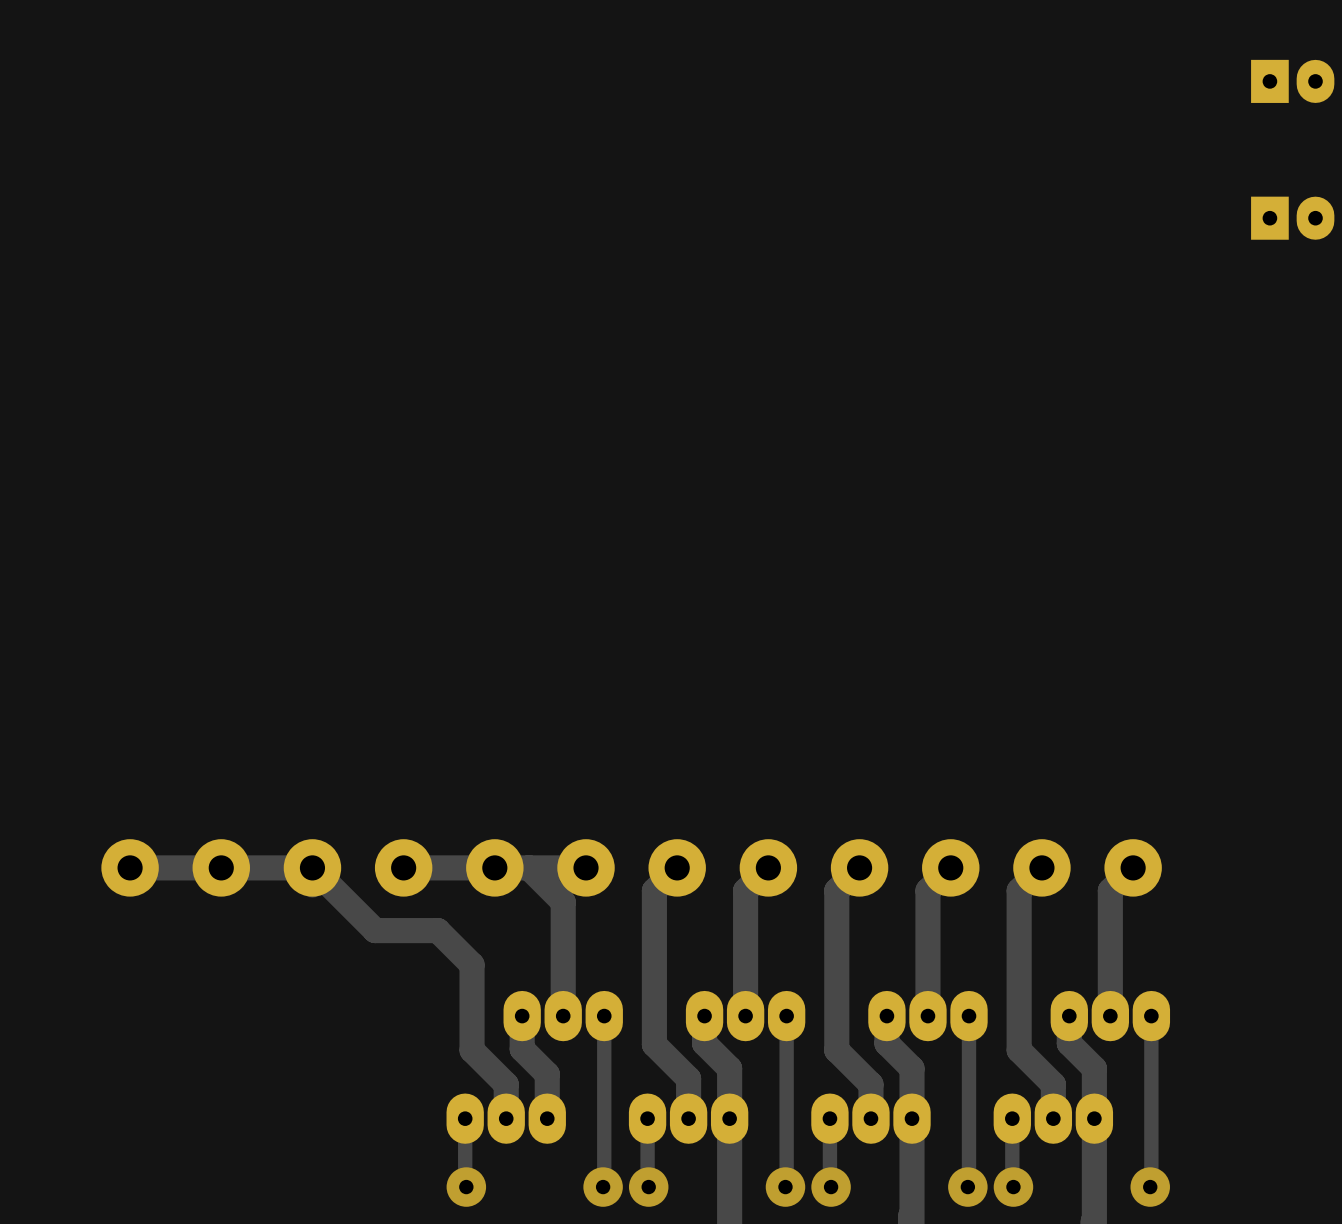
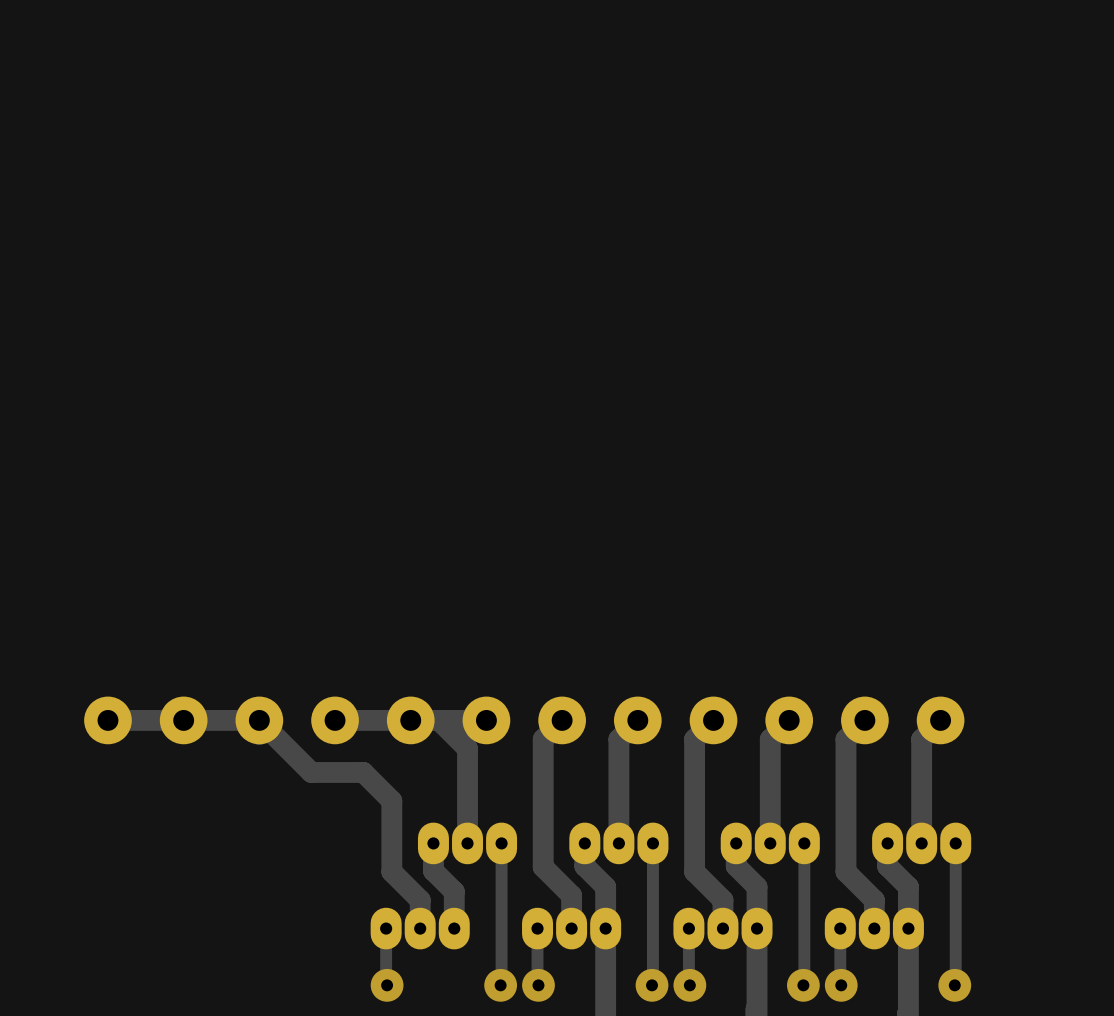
part: (1292, 81) -> none
part: (1292, 218) -> none

